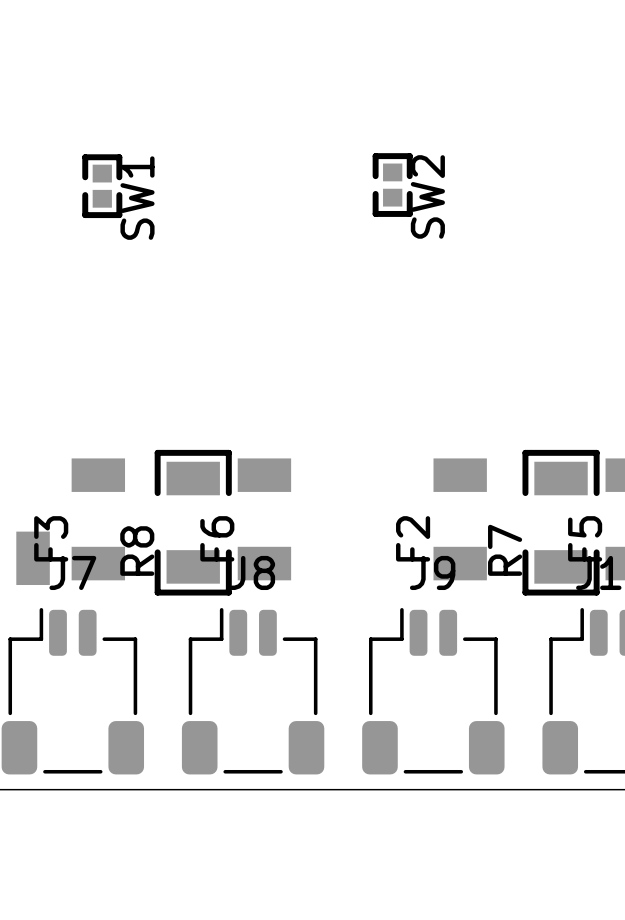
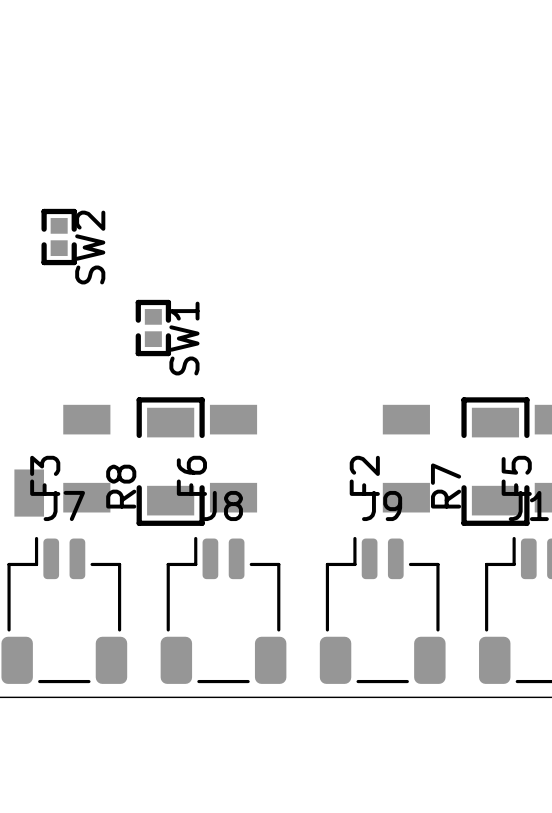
SW2 position: (392, 185) -> (59, 237)
SW1 position: (102, 186) -> (153, 328)

